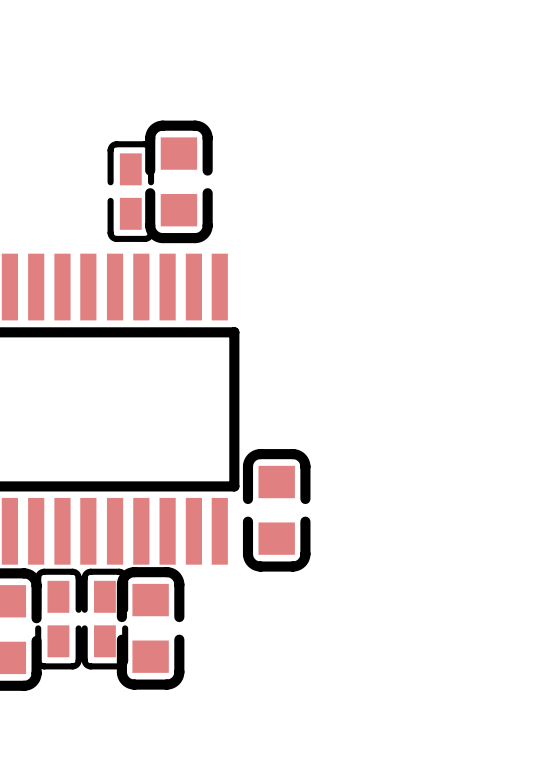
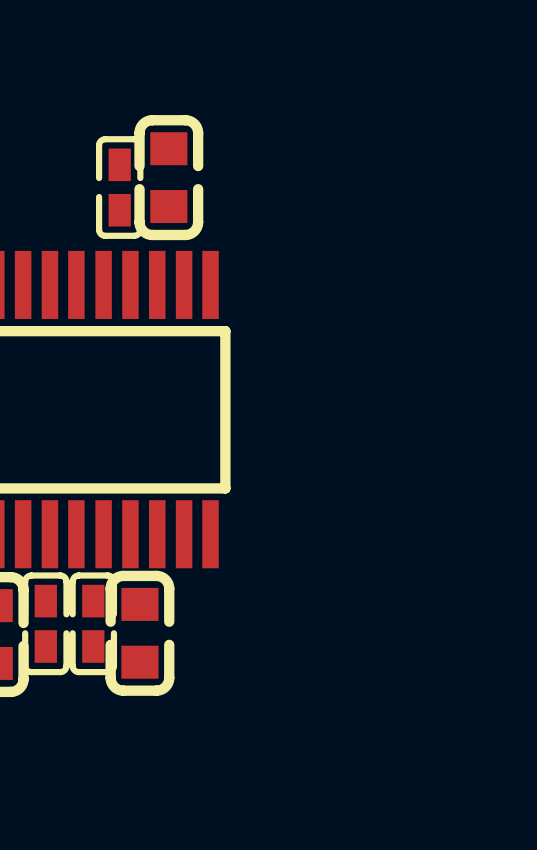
part: (276, 510) -> none

